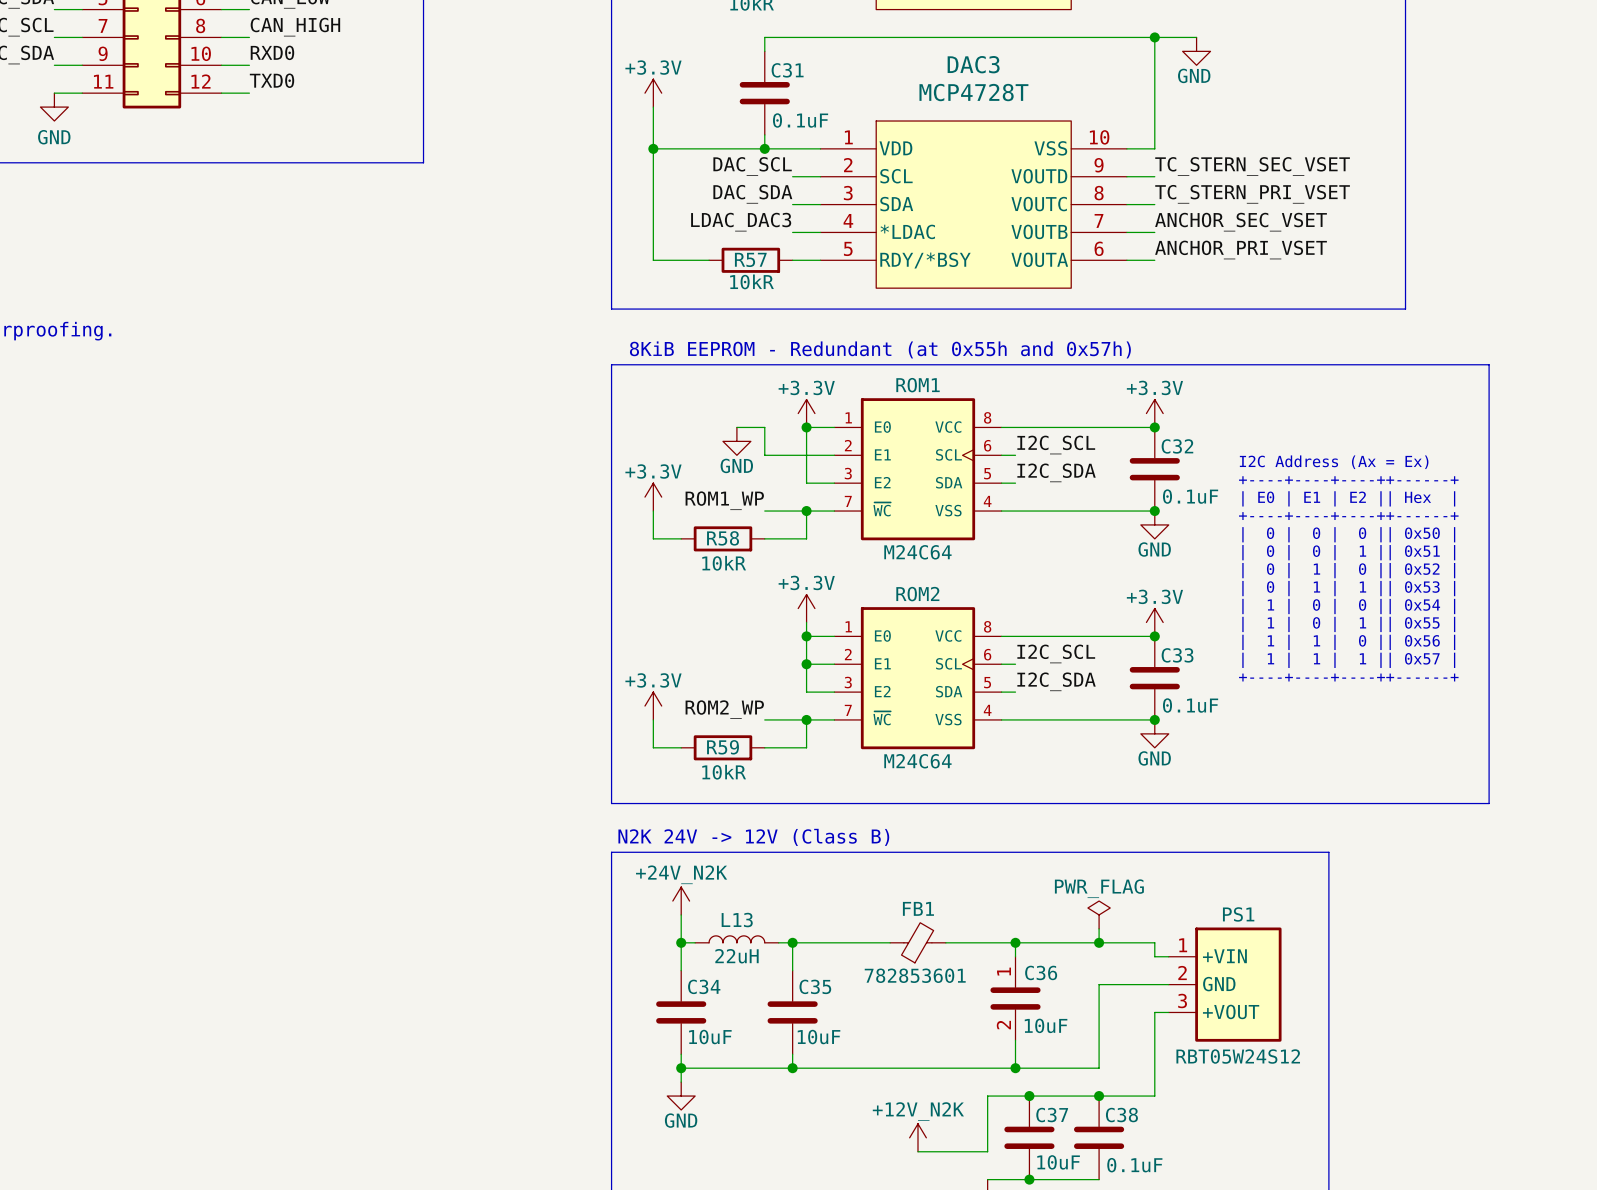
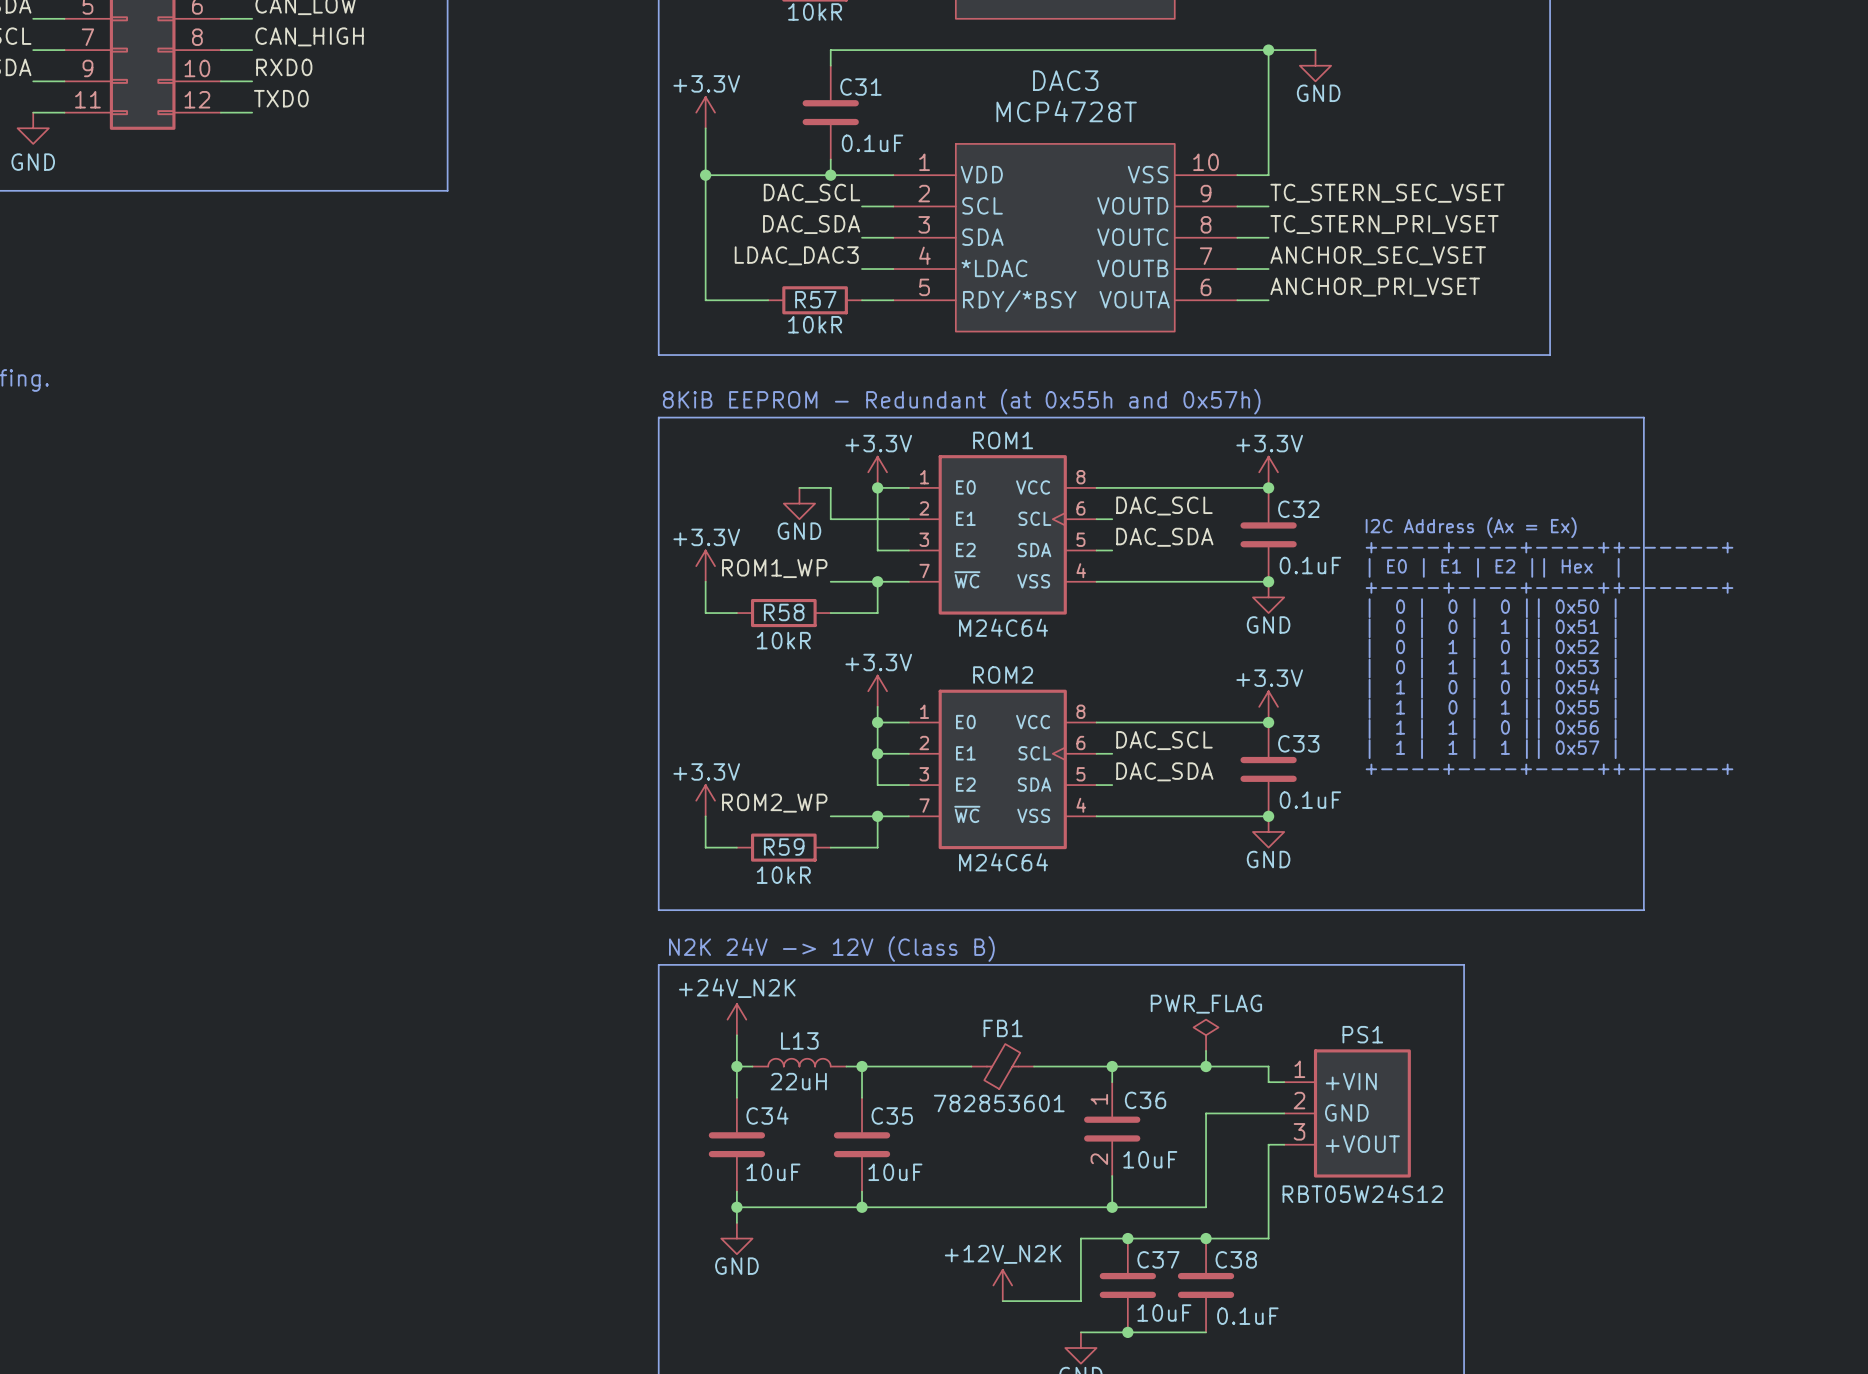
label: I2C_SCL (1056, 445) -> DAC_SCL (1164, 506)
label: I2C_SDA (1056, 472) -> DAC_SDA (1164, 537)
label: I2C_SCL (1056, 653) -> DAC_SCL (1164, 740)
label: I2C_SDA (1056, 681) -> DAC_SDA (1164, 771)

